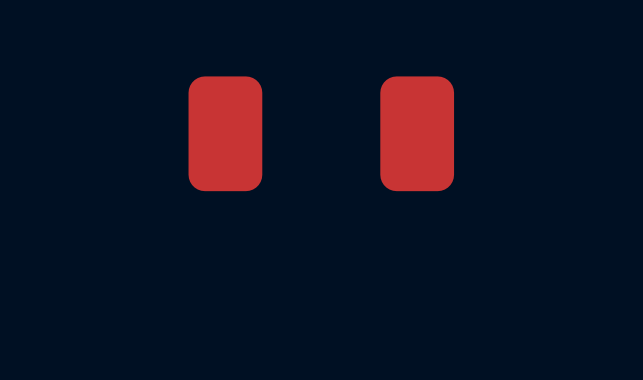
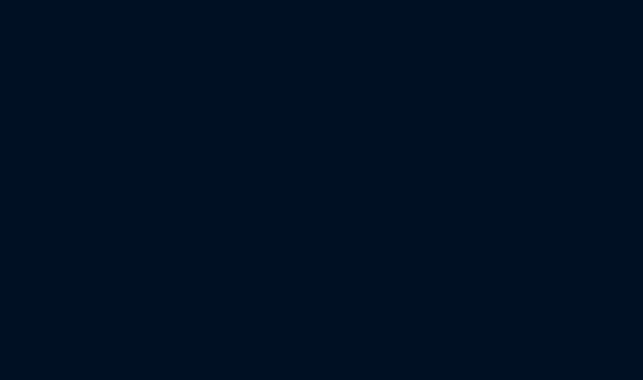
part: (321, 133) -> none

